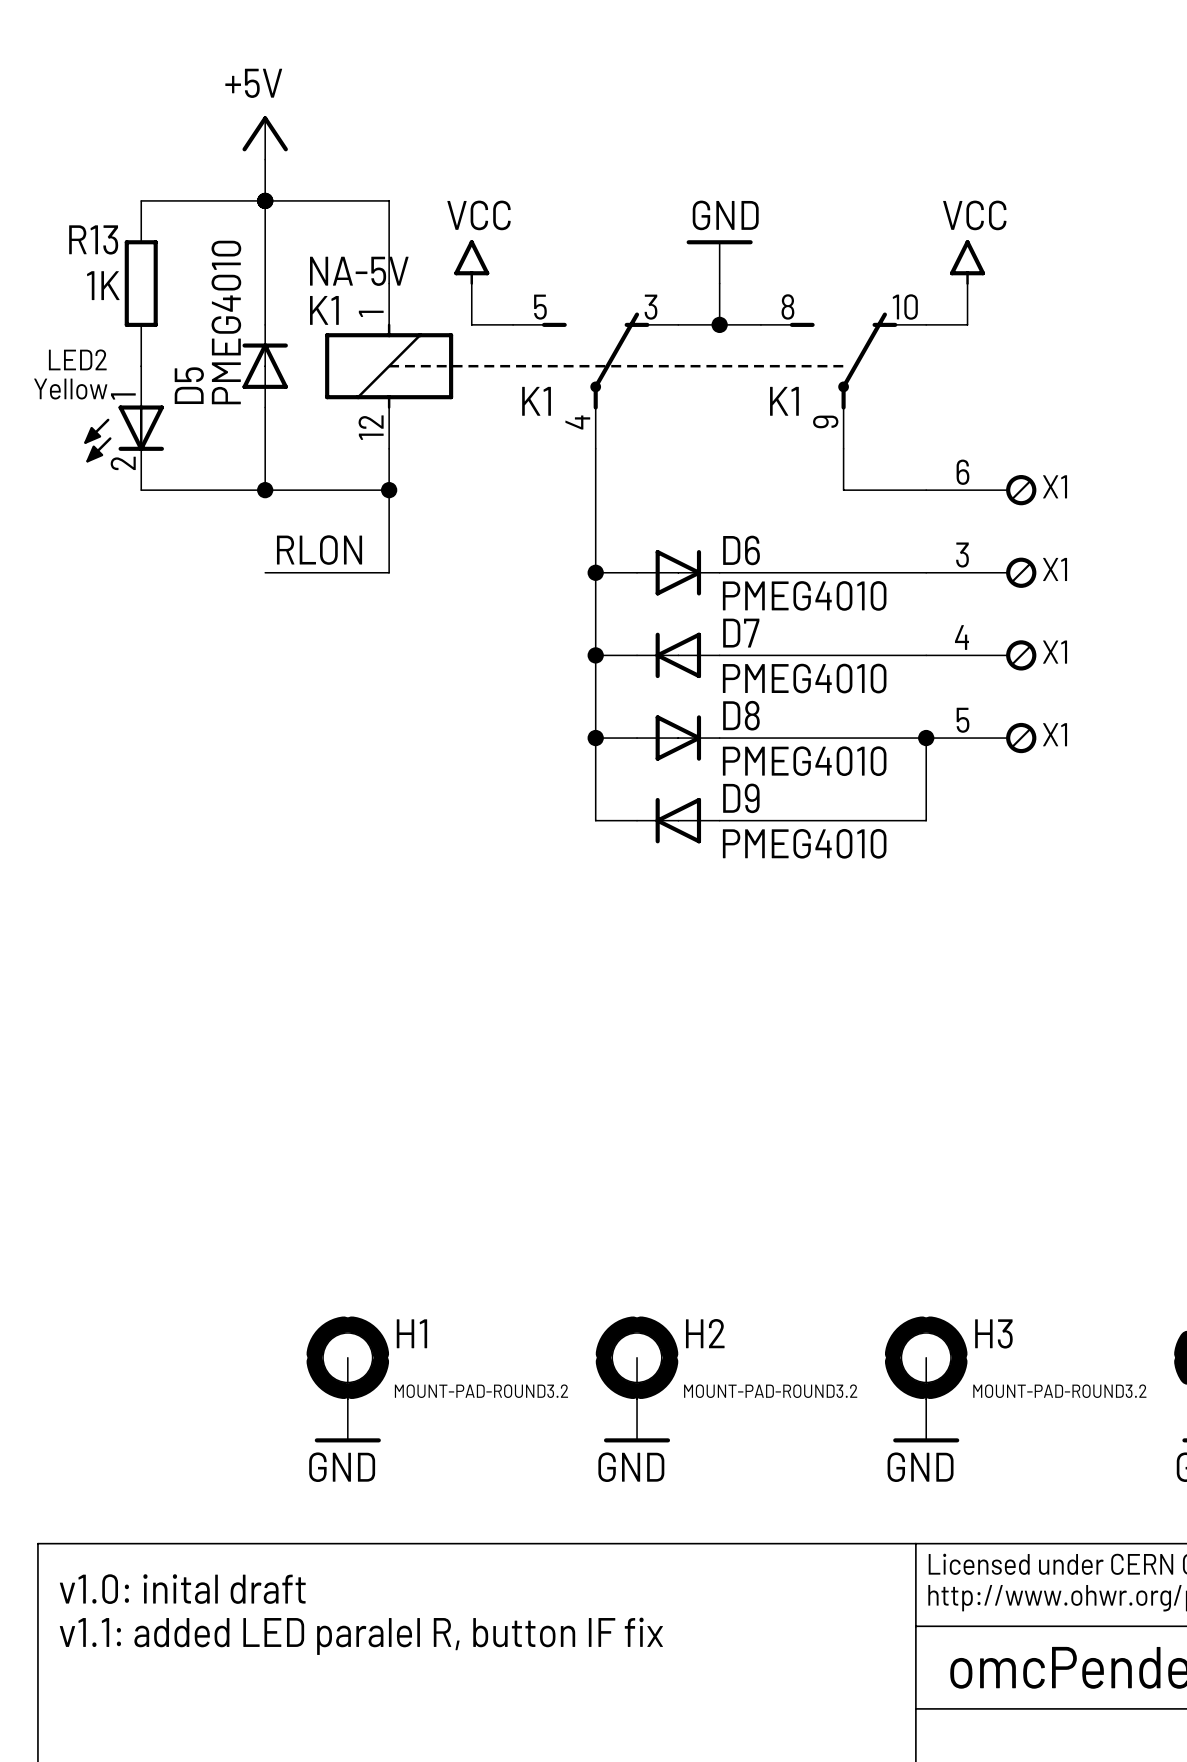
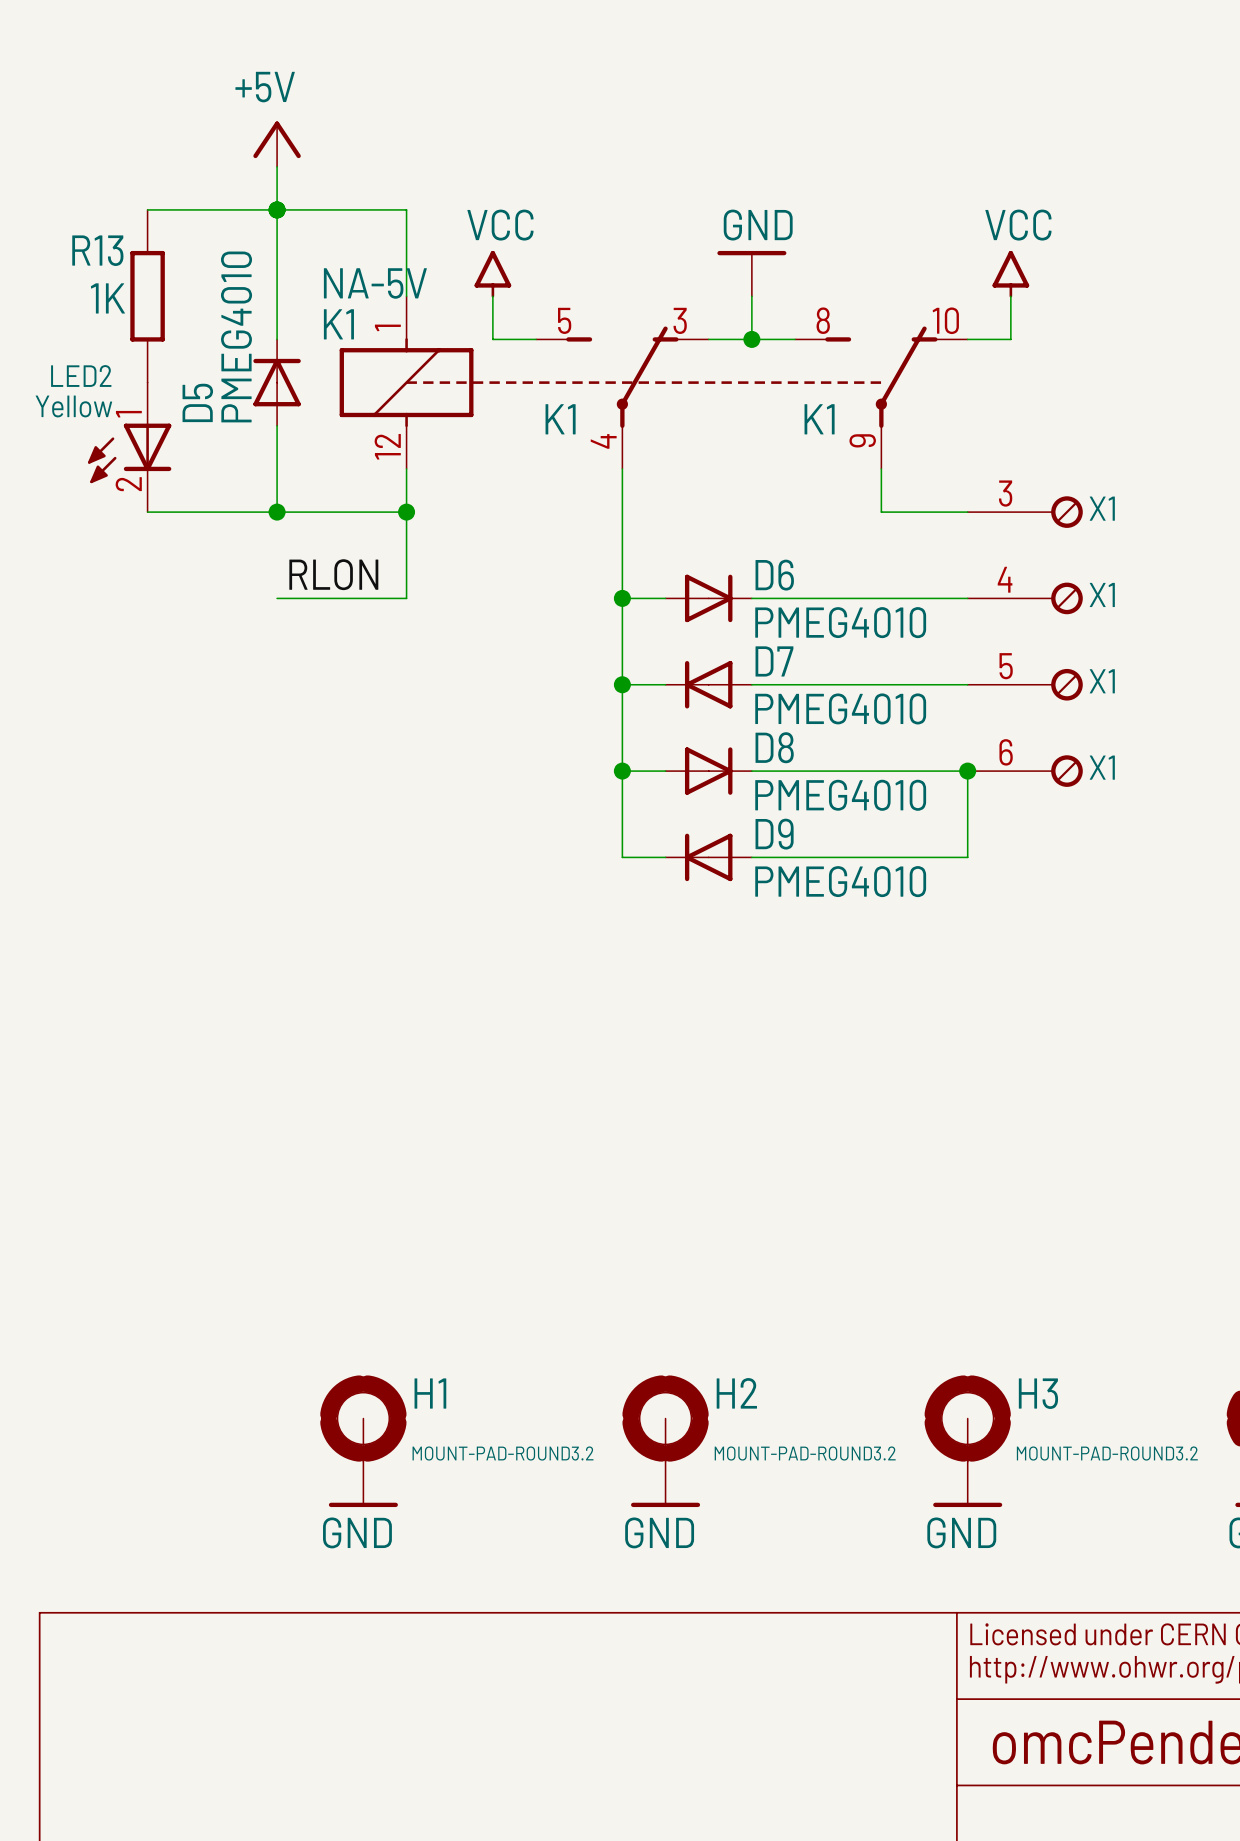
X1 pin number: 6 (962, 472) -> 3 (1005, 493)
X1 pin number: 3 (962, 555) -> 4 (1005, 579)
X1 pin number: 4 (961, 637) -> 5 (1006, 666)
X1 pin number: 5 (963, 720) -> 6 (1006, 752)
text: v1.0: inital draft (182, 1589) -> none
text: v1.1: added LED paralel R, button IF fix (361, 1636) -> none

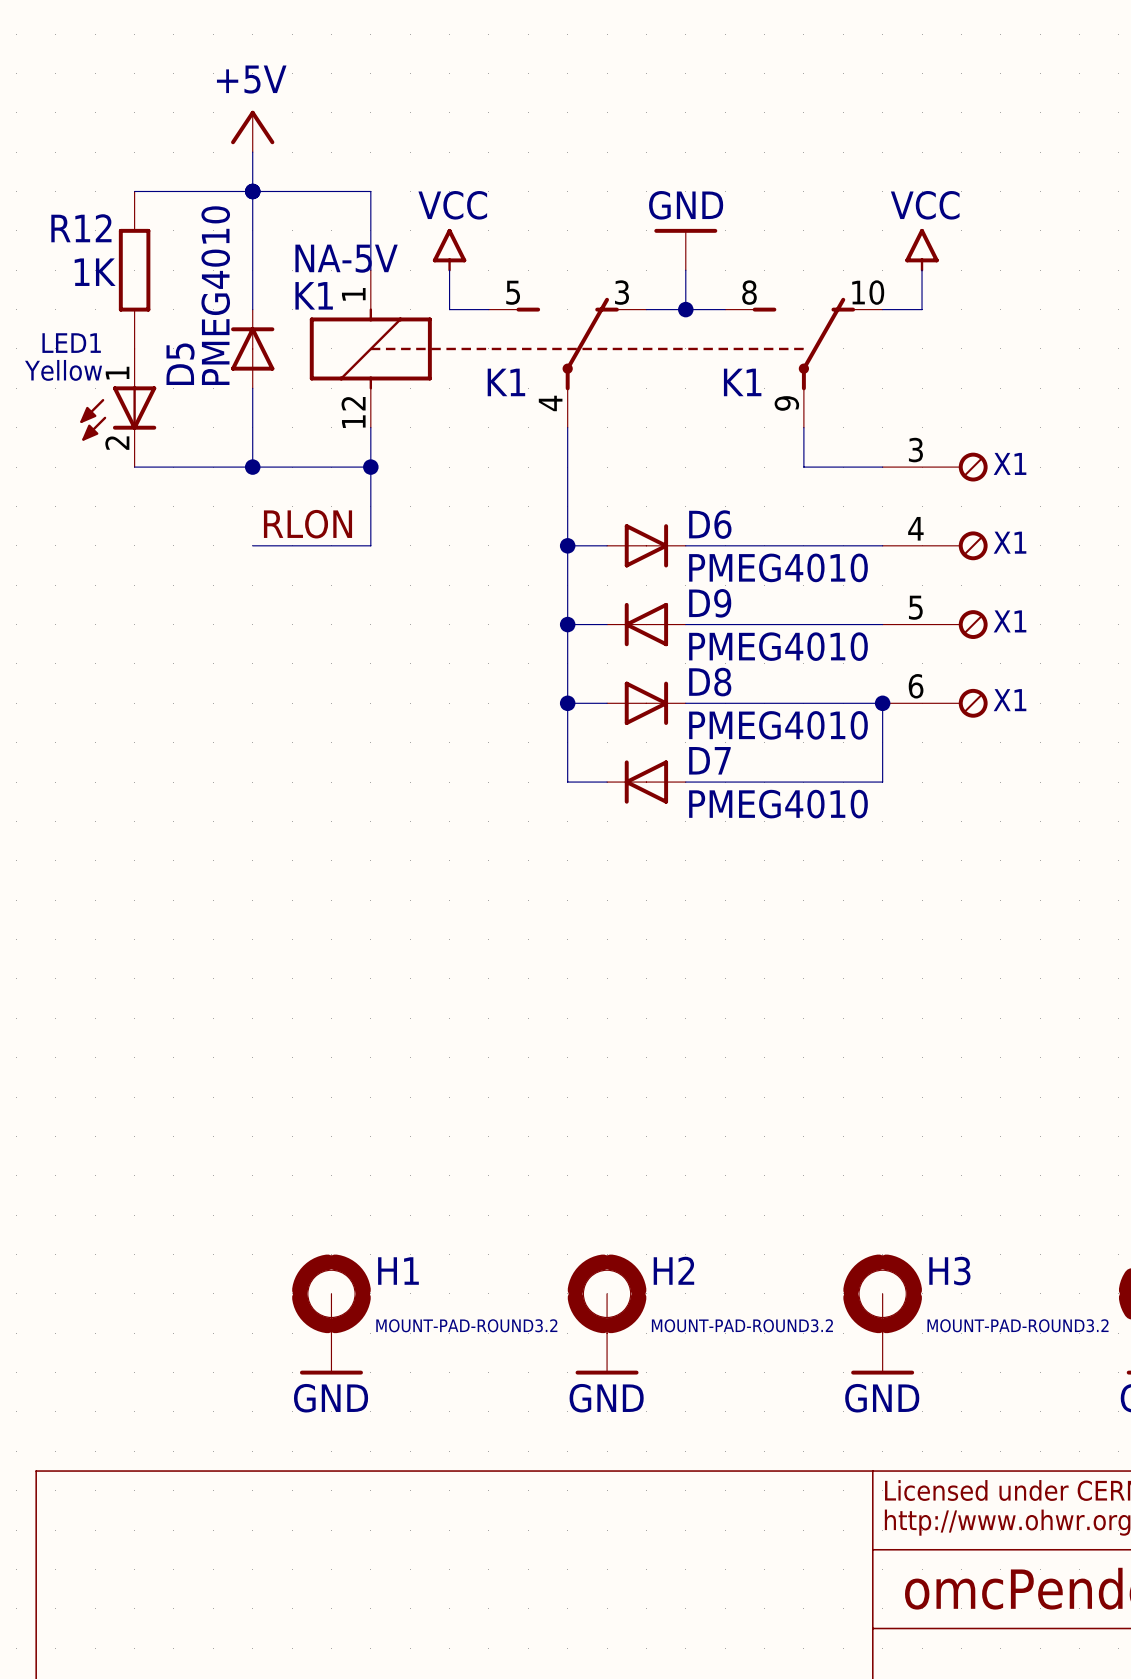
R13 name: R13 (97, 250) -> R12 (81, 228)
LED2 name: LED2 (81, 376) -> LED1 (71, 343)
D7 name: D7 (774, 661) -> D9 (710, 603)
D9 name: D9 (774, 834) -> D7 (709, 760)

